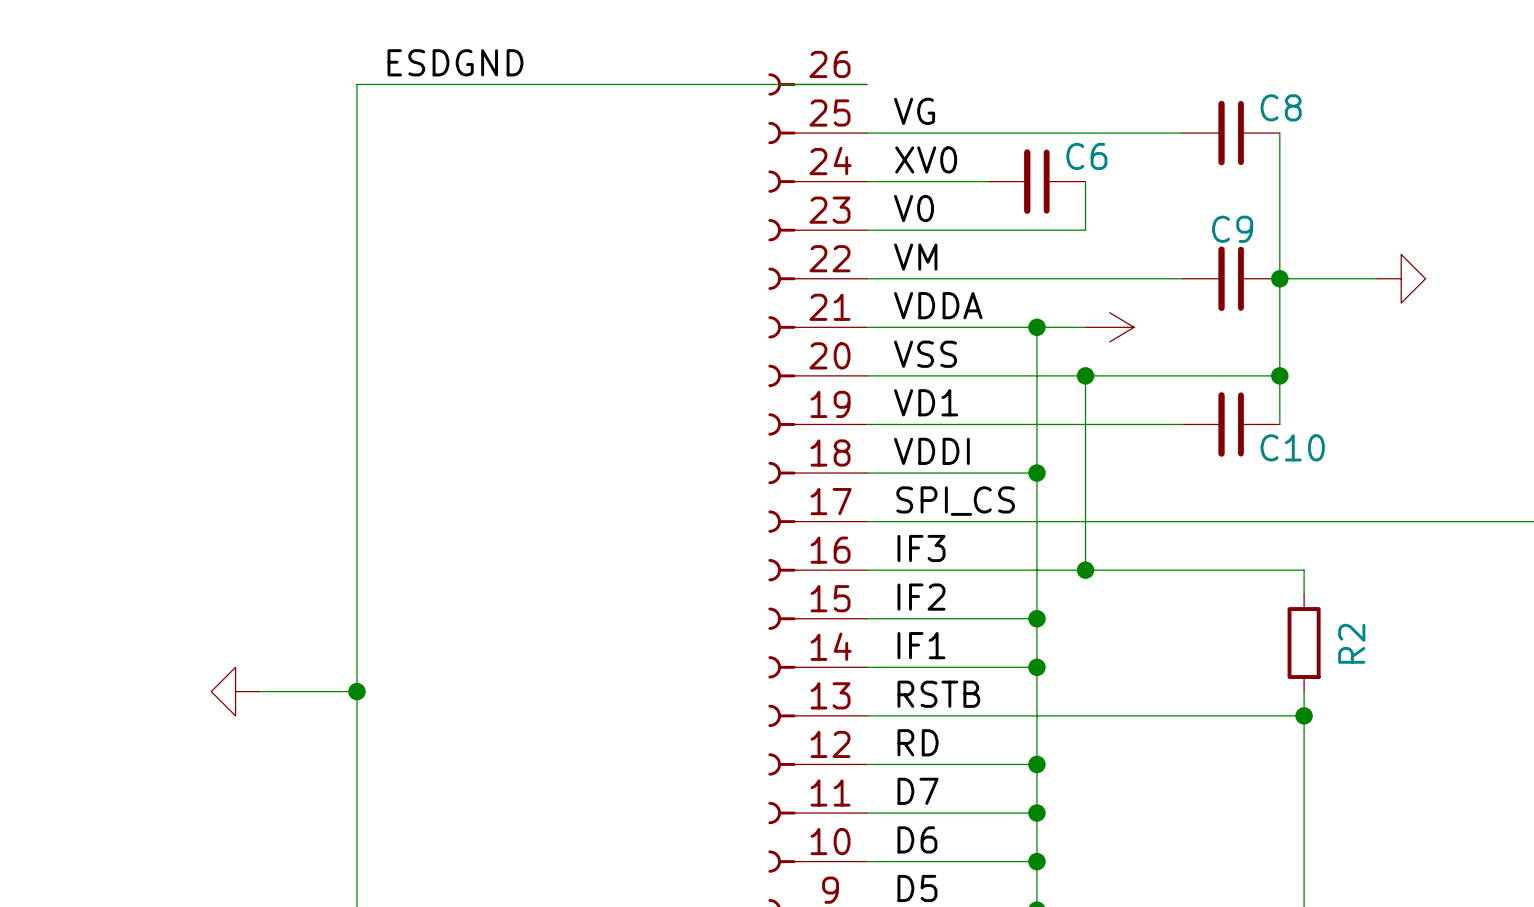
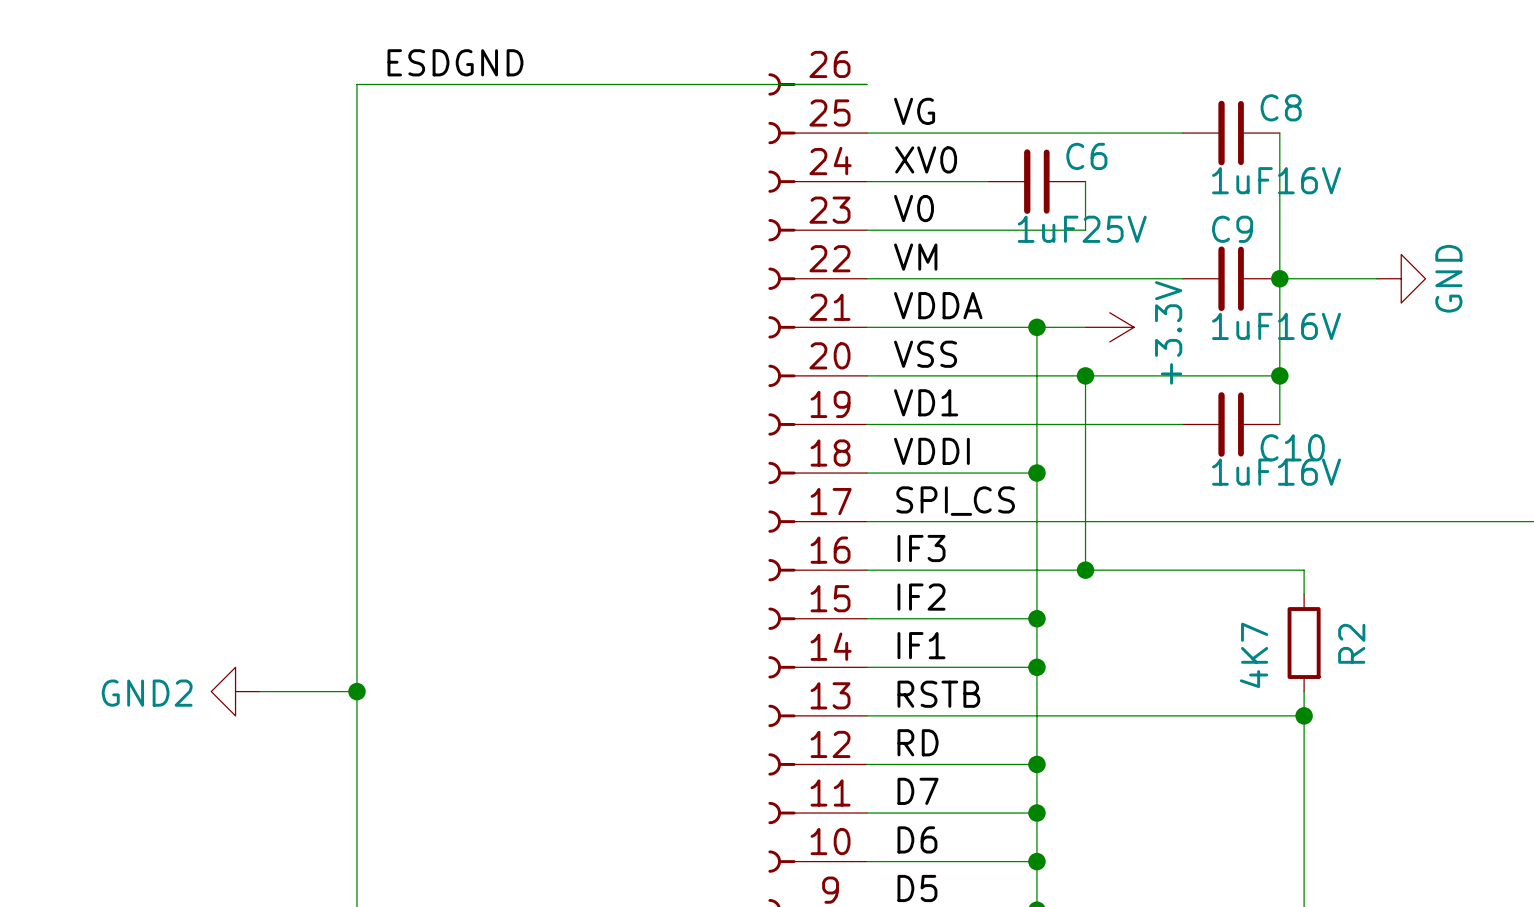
C8 value: none -> 1uF16V (1276, 180)
C6 value: none -> 1uF25V (1082, 229)
power symbol text: none -> GND (1448, 278)
C9 value: none -> 1uF16V (1276, 326)
power symbol text: none -> +3.3V (1168, 332)
C10 value: none -> 1uF16V (1276, 472)
R2 value: none -> 4K7 (1254, 655)
power symbol text: none -> GND2 (147, 693)

